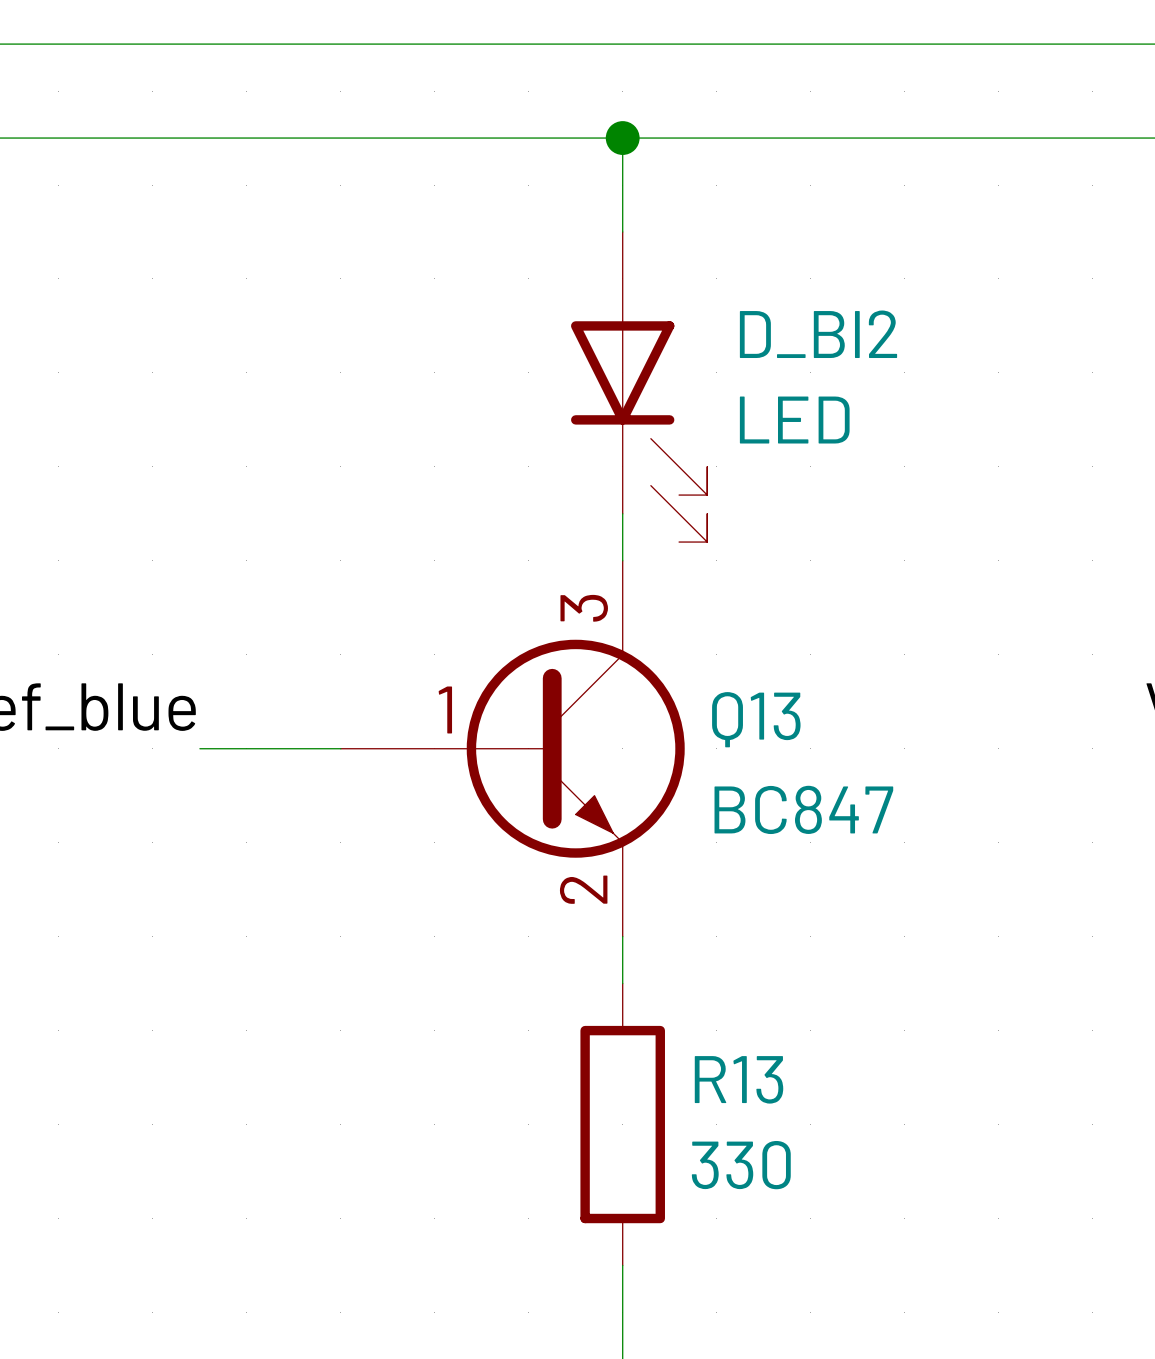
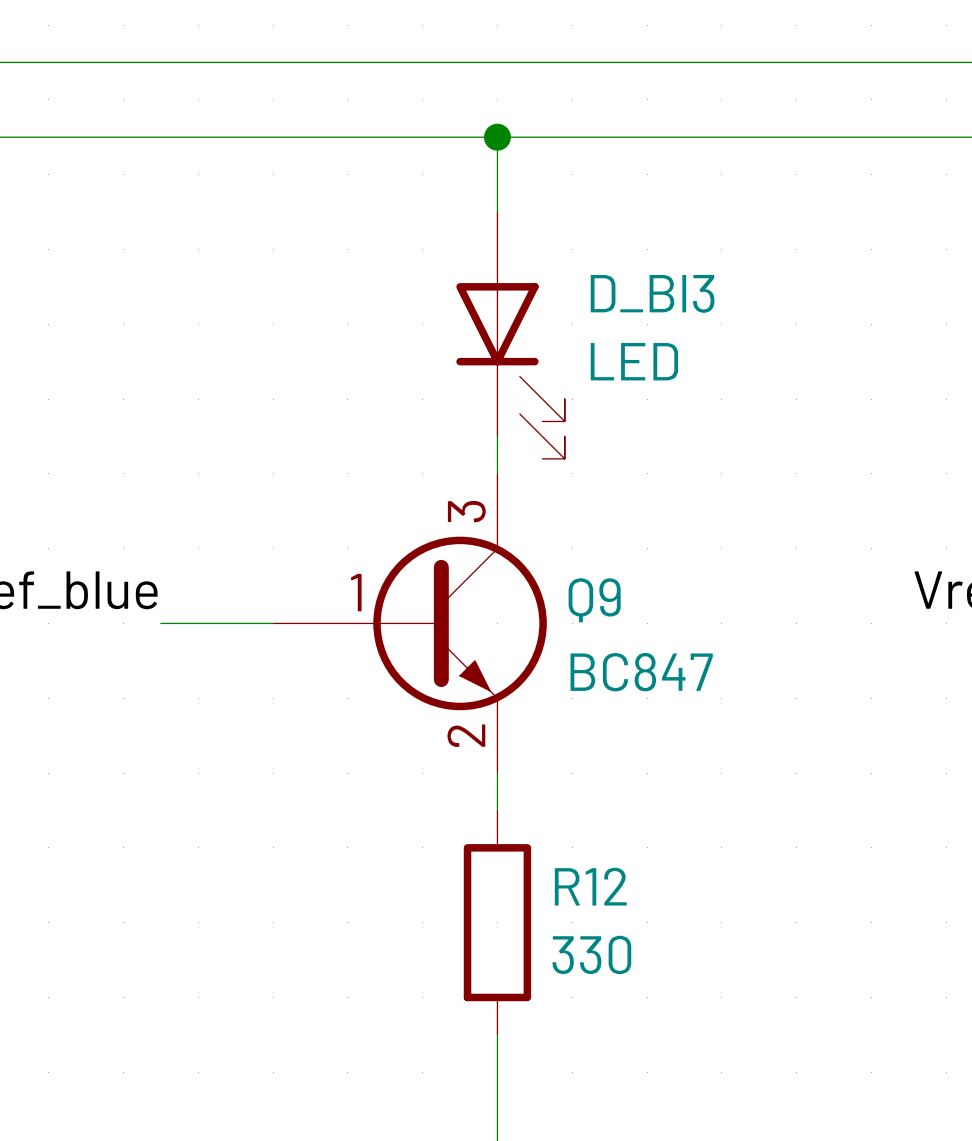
D_Bl2 name: D_Bl2 (818, 334) -> D_Bl3 (652, 293)
Q13 name: Q13 (756, 719) -> Q9 (594, 600)
R13 name: R13 (739, 1079) -> R12 (590, 886)

